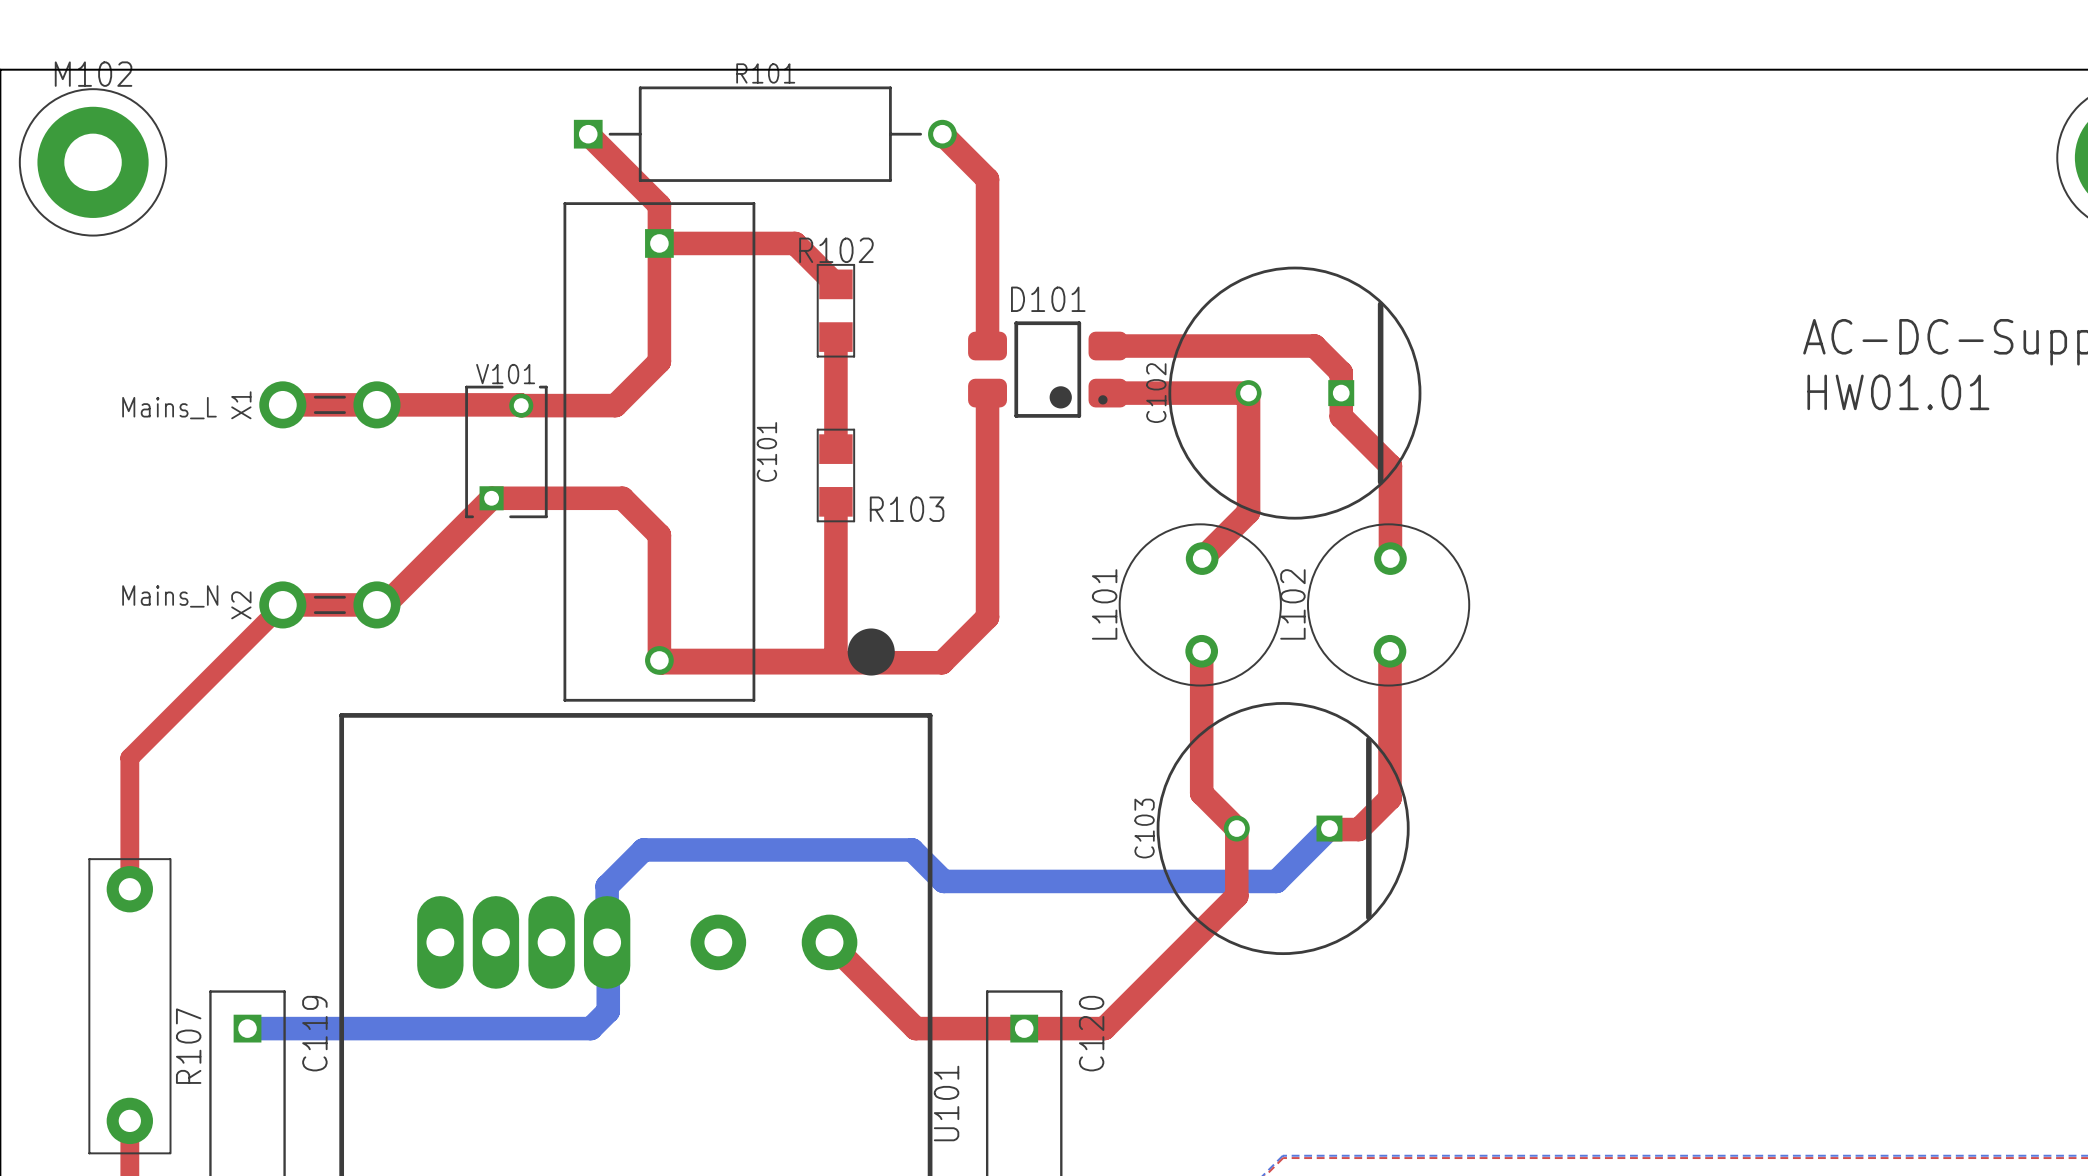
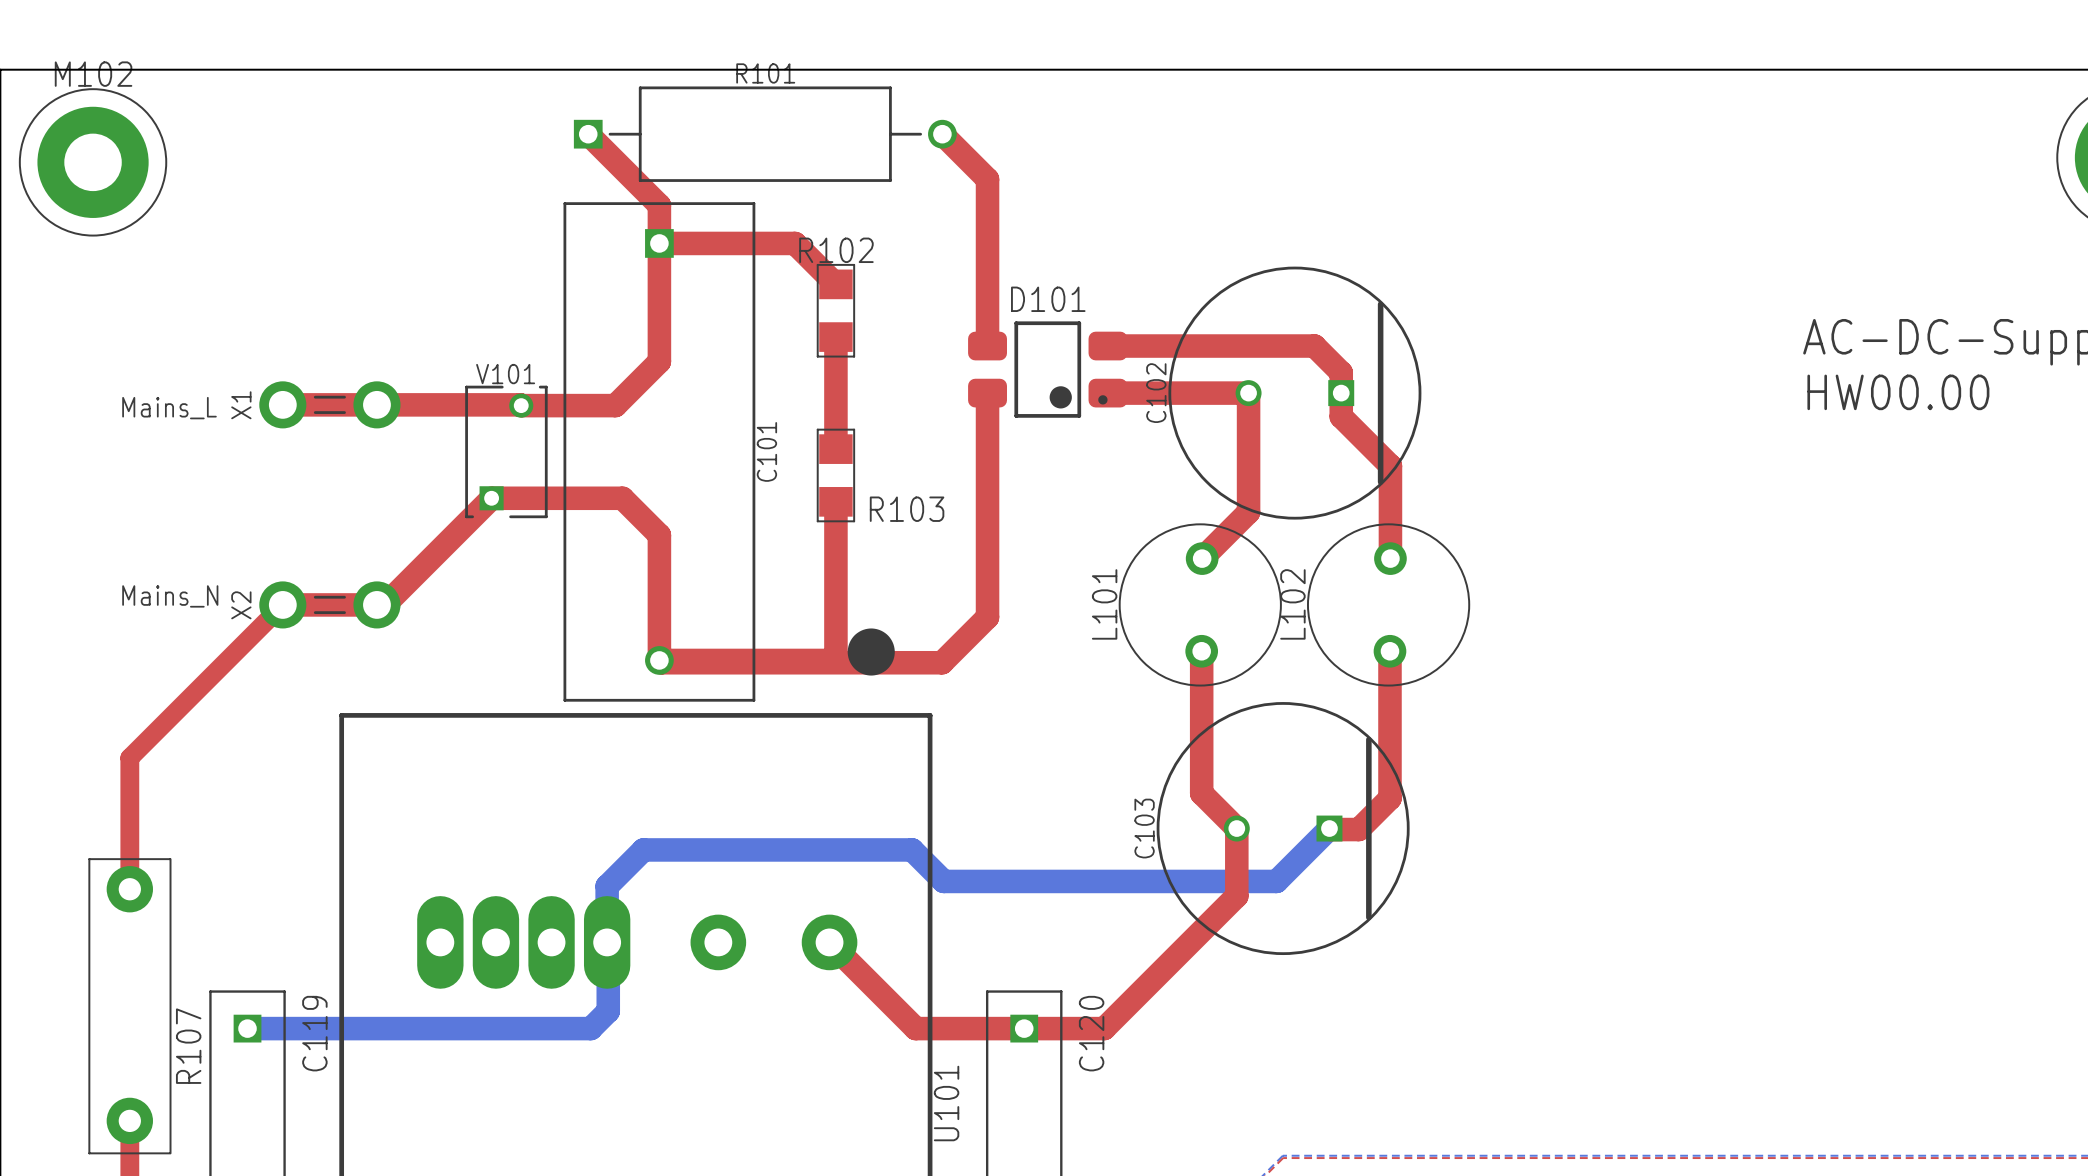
text: HW01.01 (1898, 392) -> HW00.00 (1898, 392)

